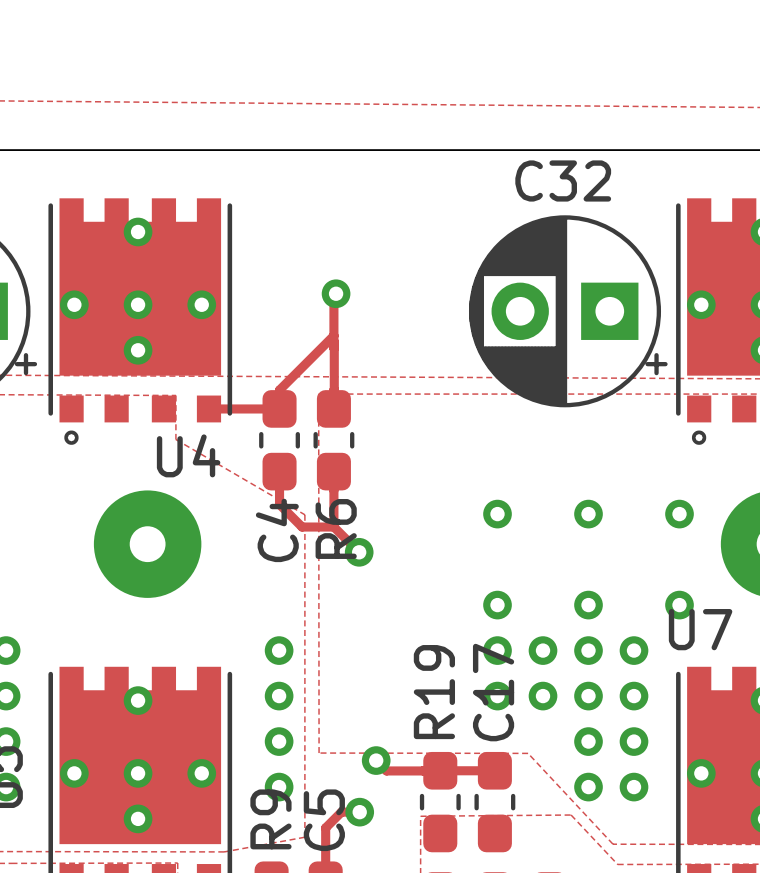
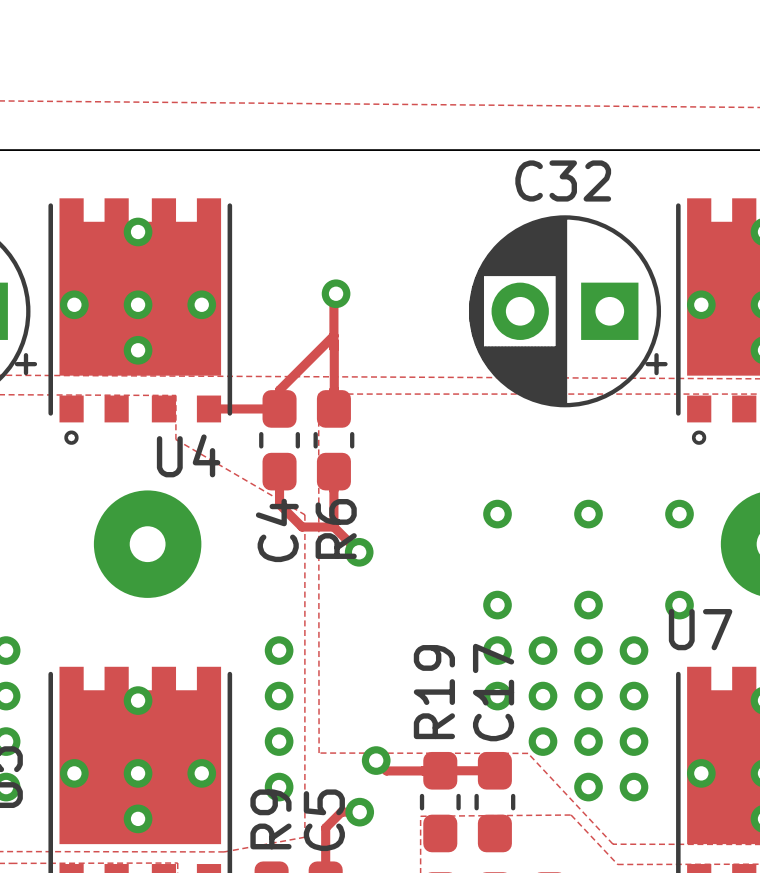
via: none -> (543, 741)

